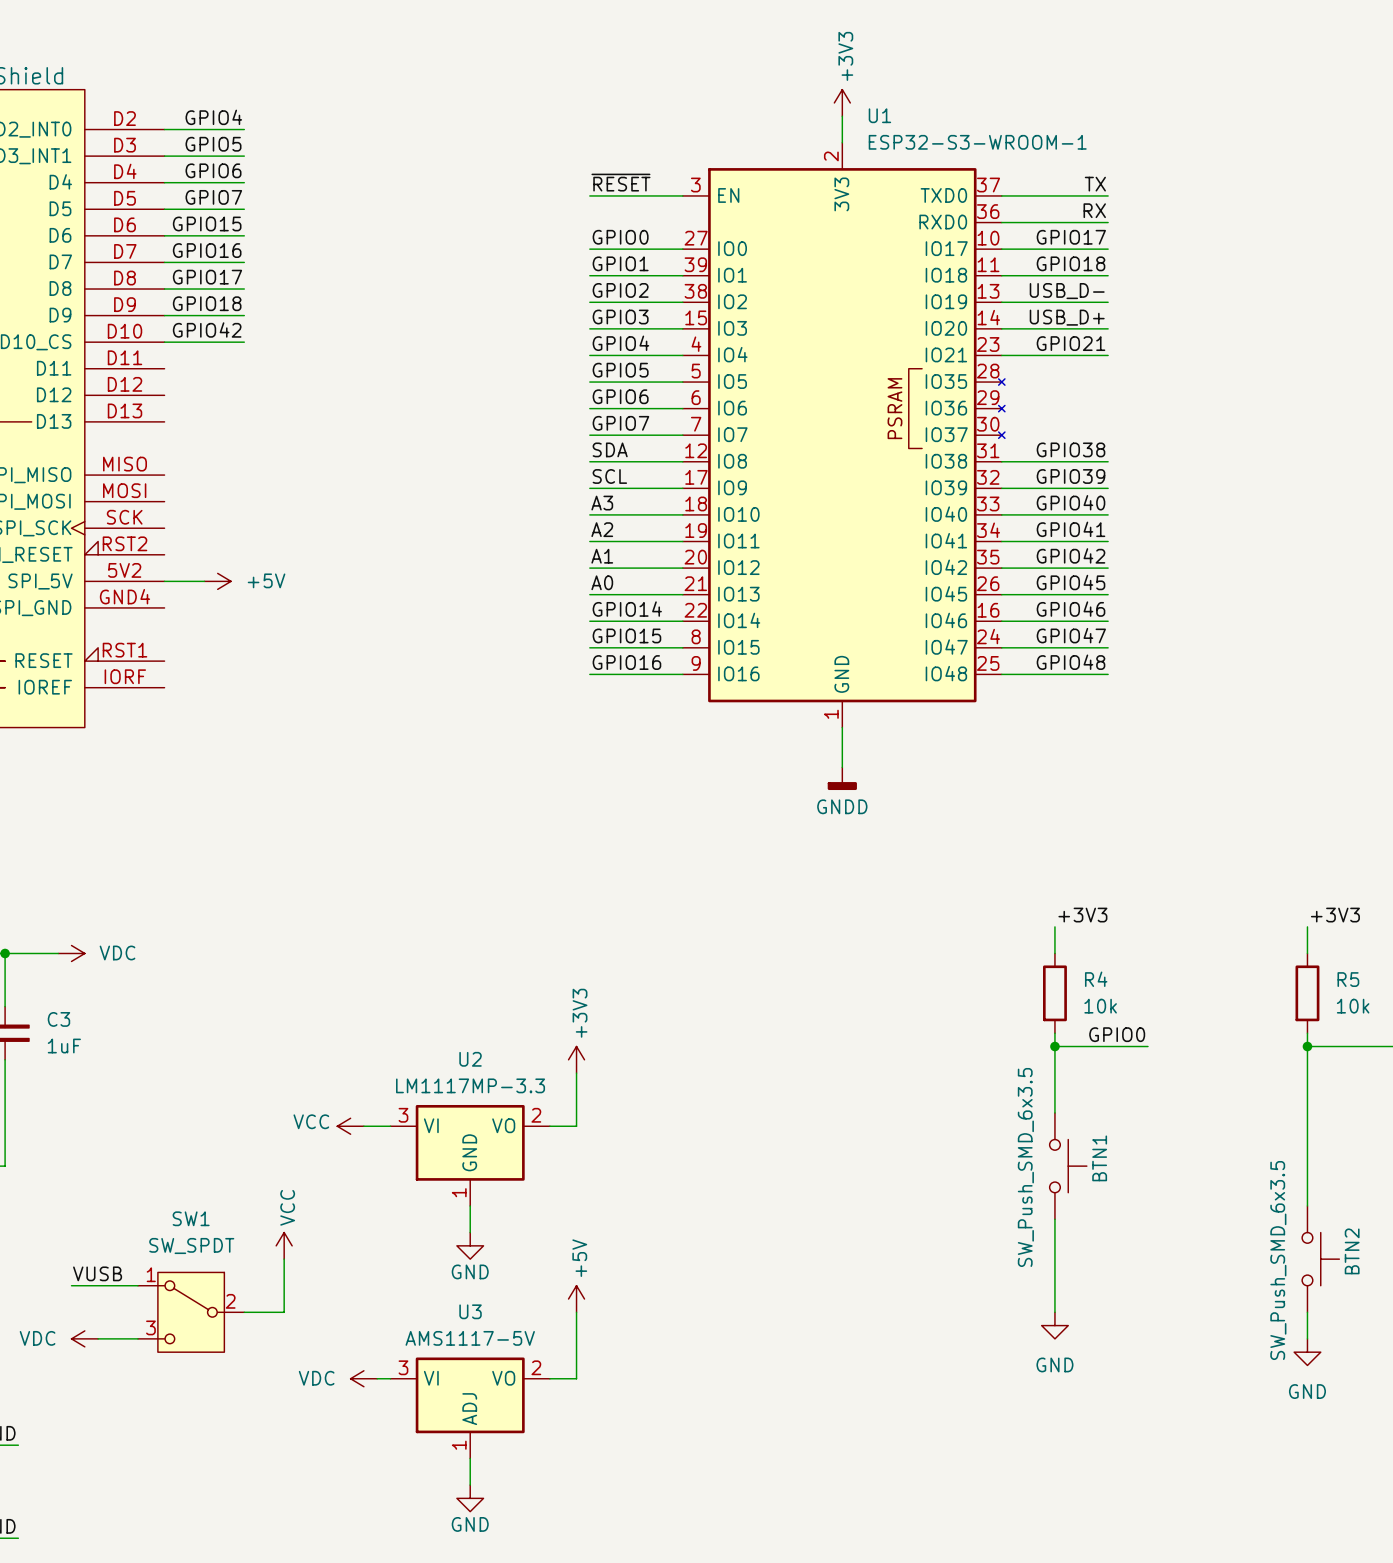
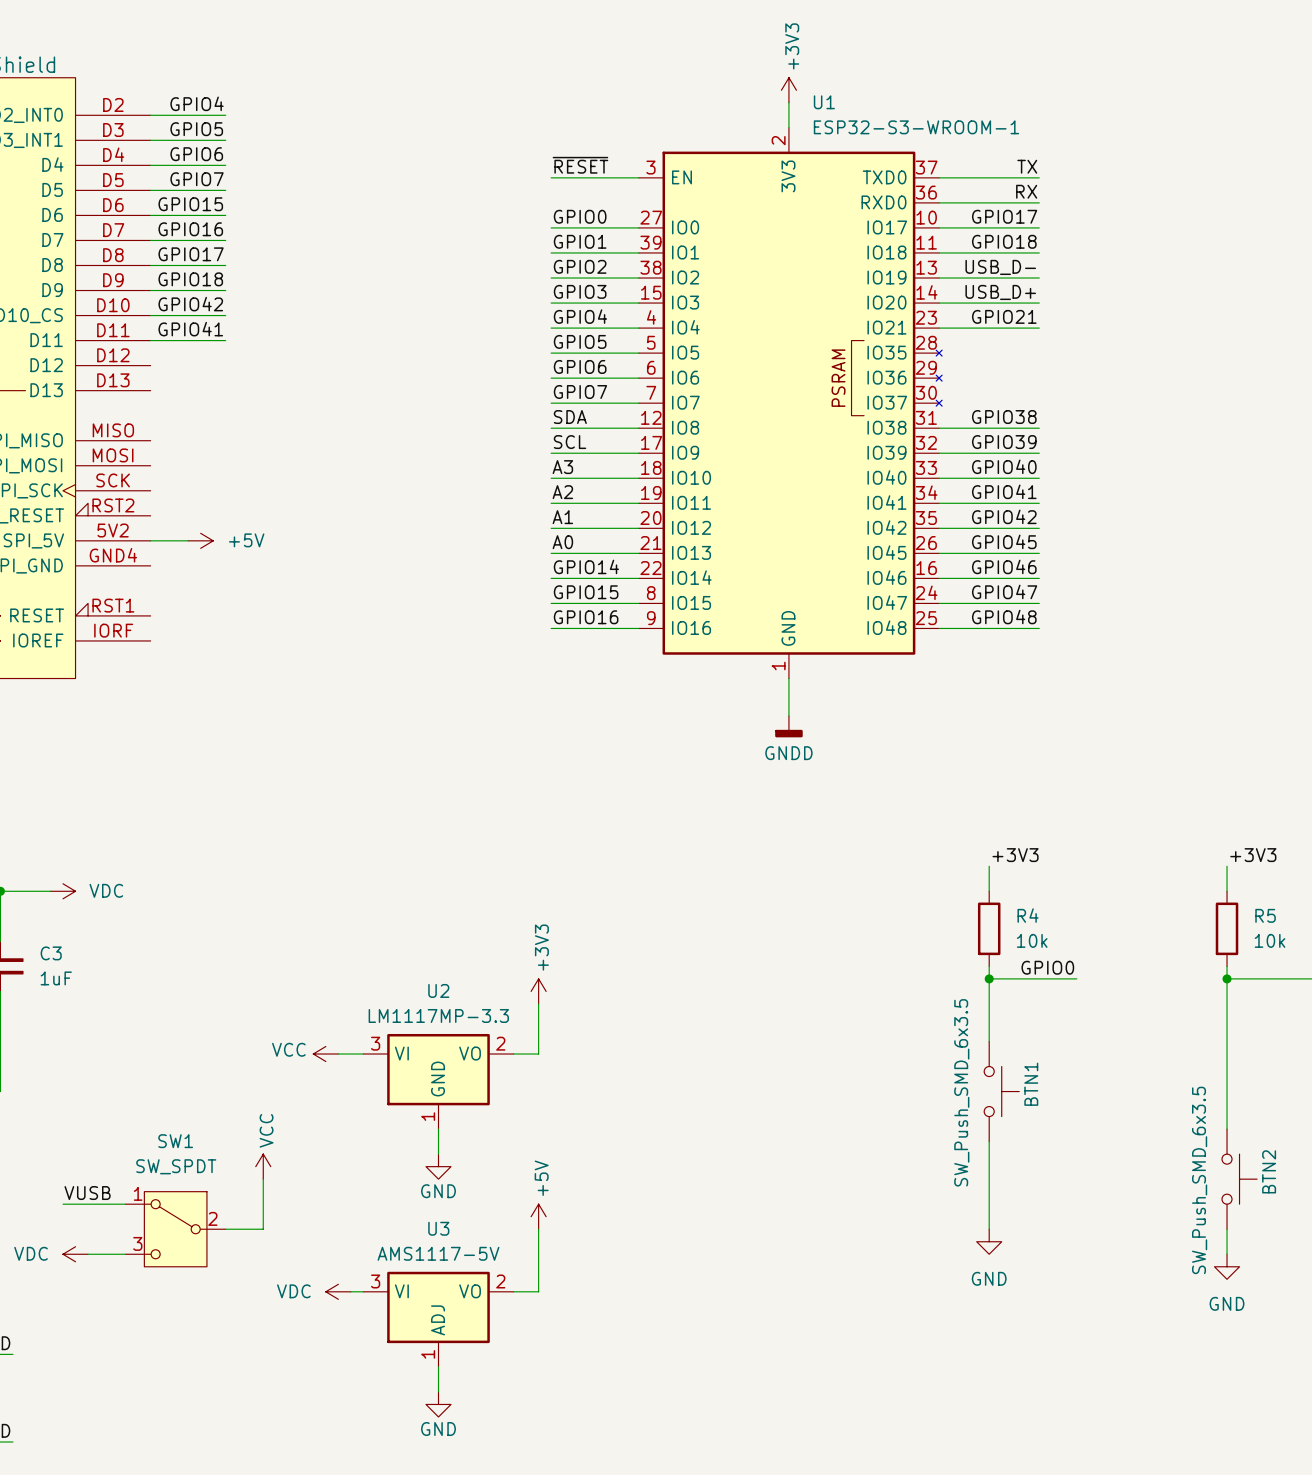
label: none -> GPIO41 (190, 329)
wire: none -> (150, 340) (225, 340)

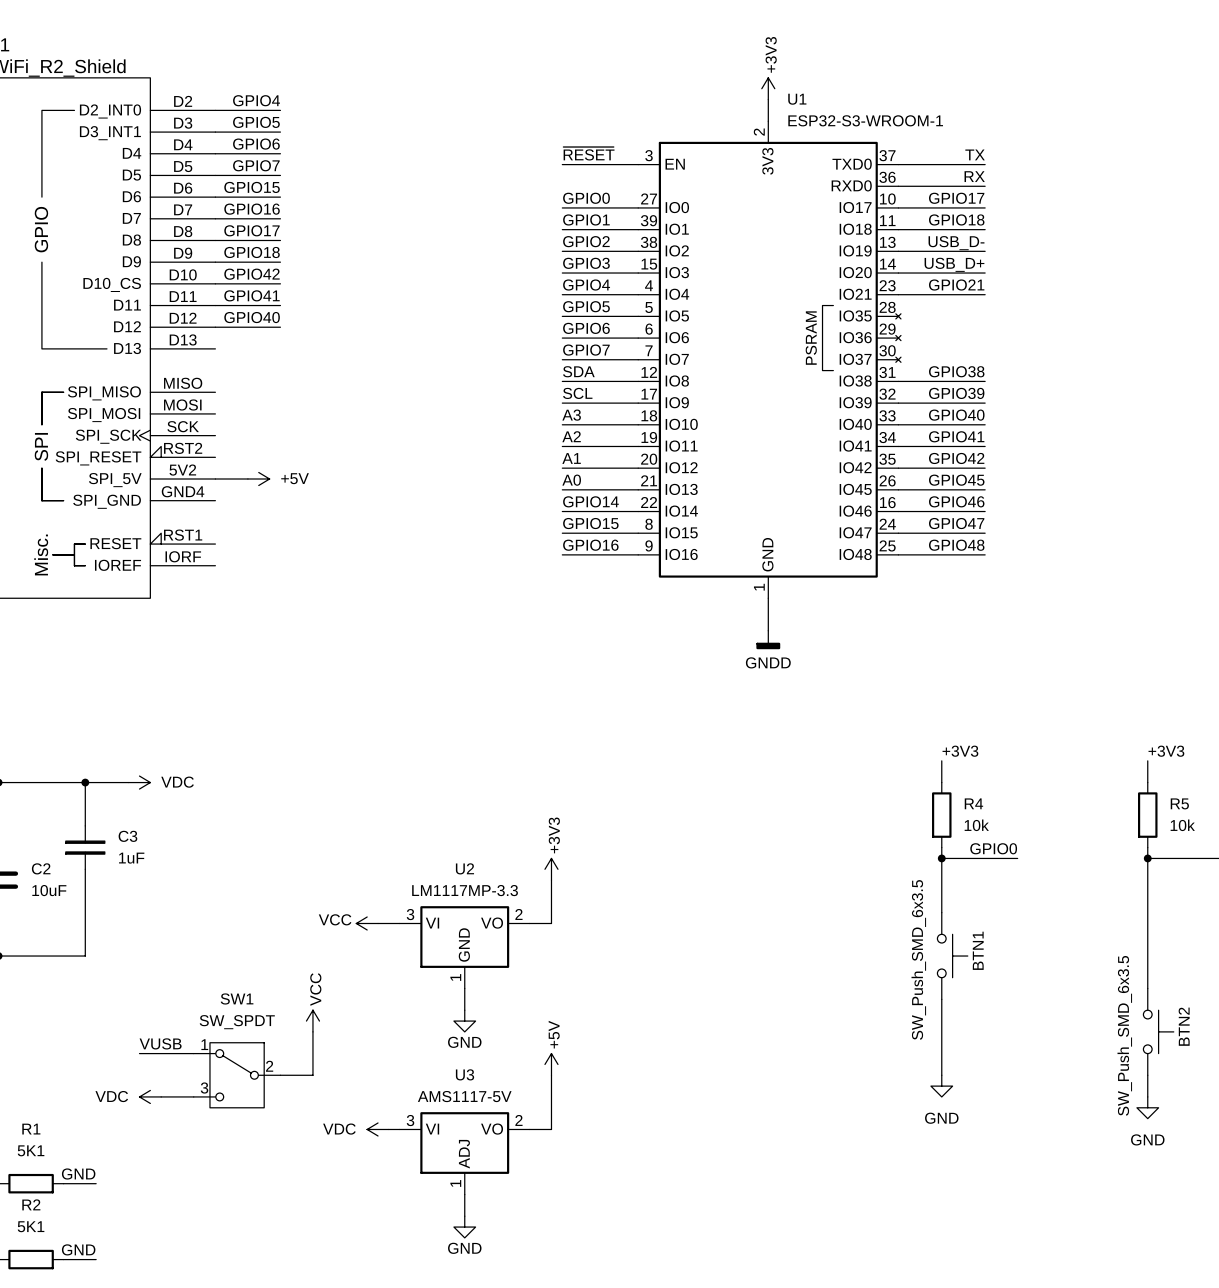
label: none -> GPIO40 (252, 317)
wire: none -> (215, 327) (280, 327)

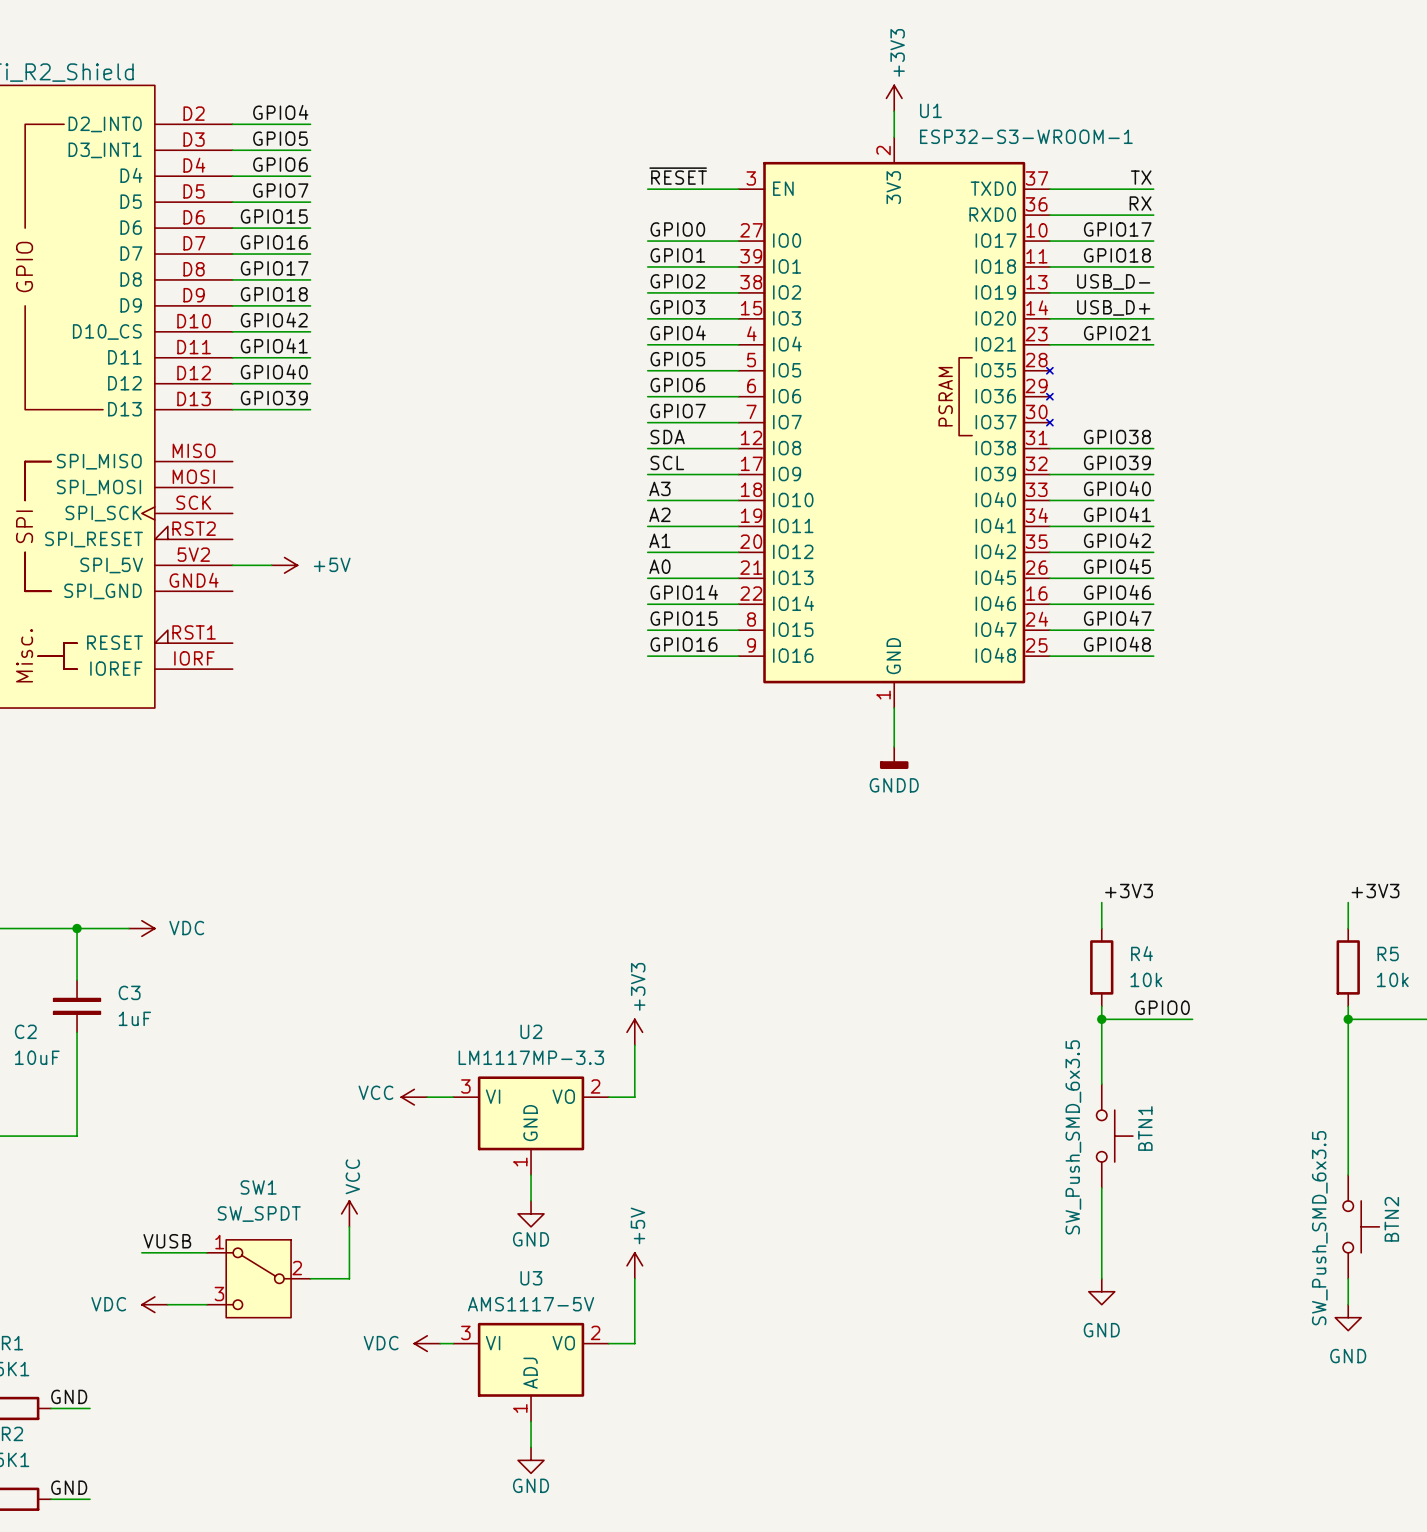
label: none -> GPIO39 (274, 398)
wire: none -> (232, 409) (310, 409)

